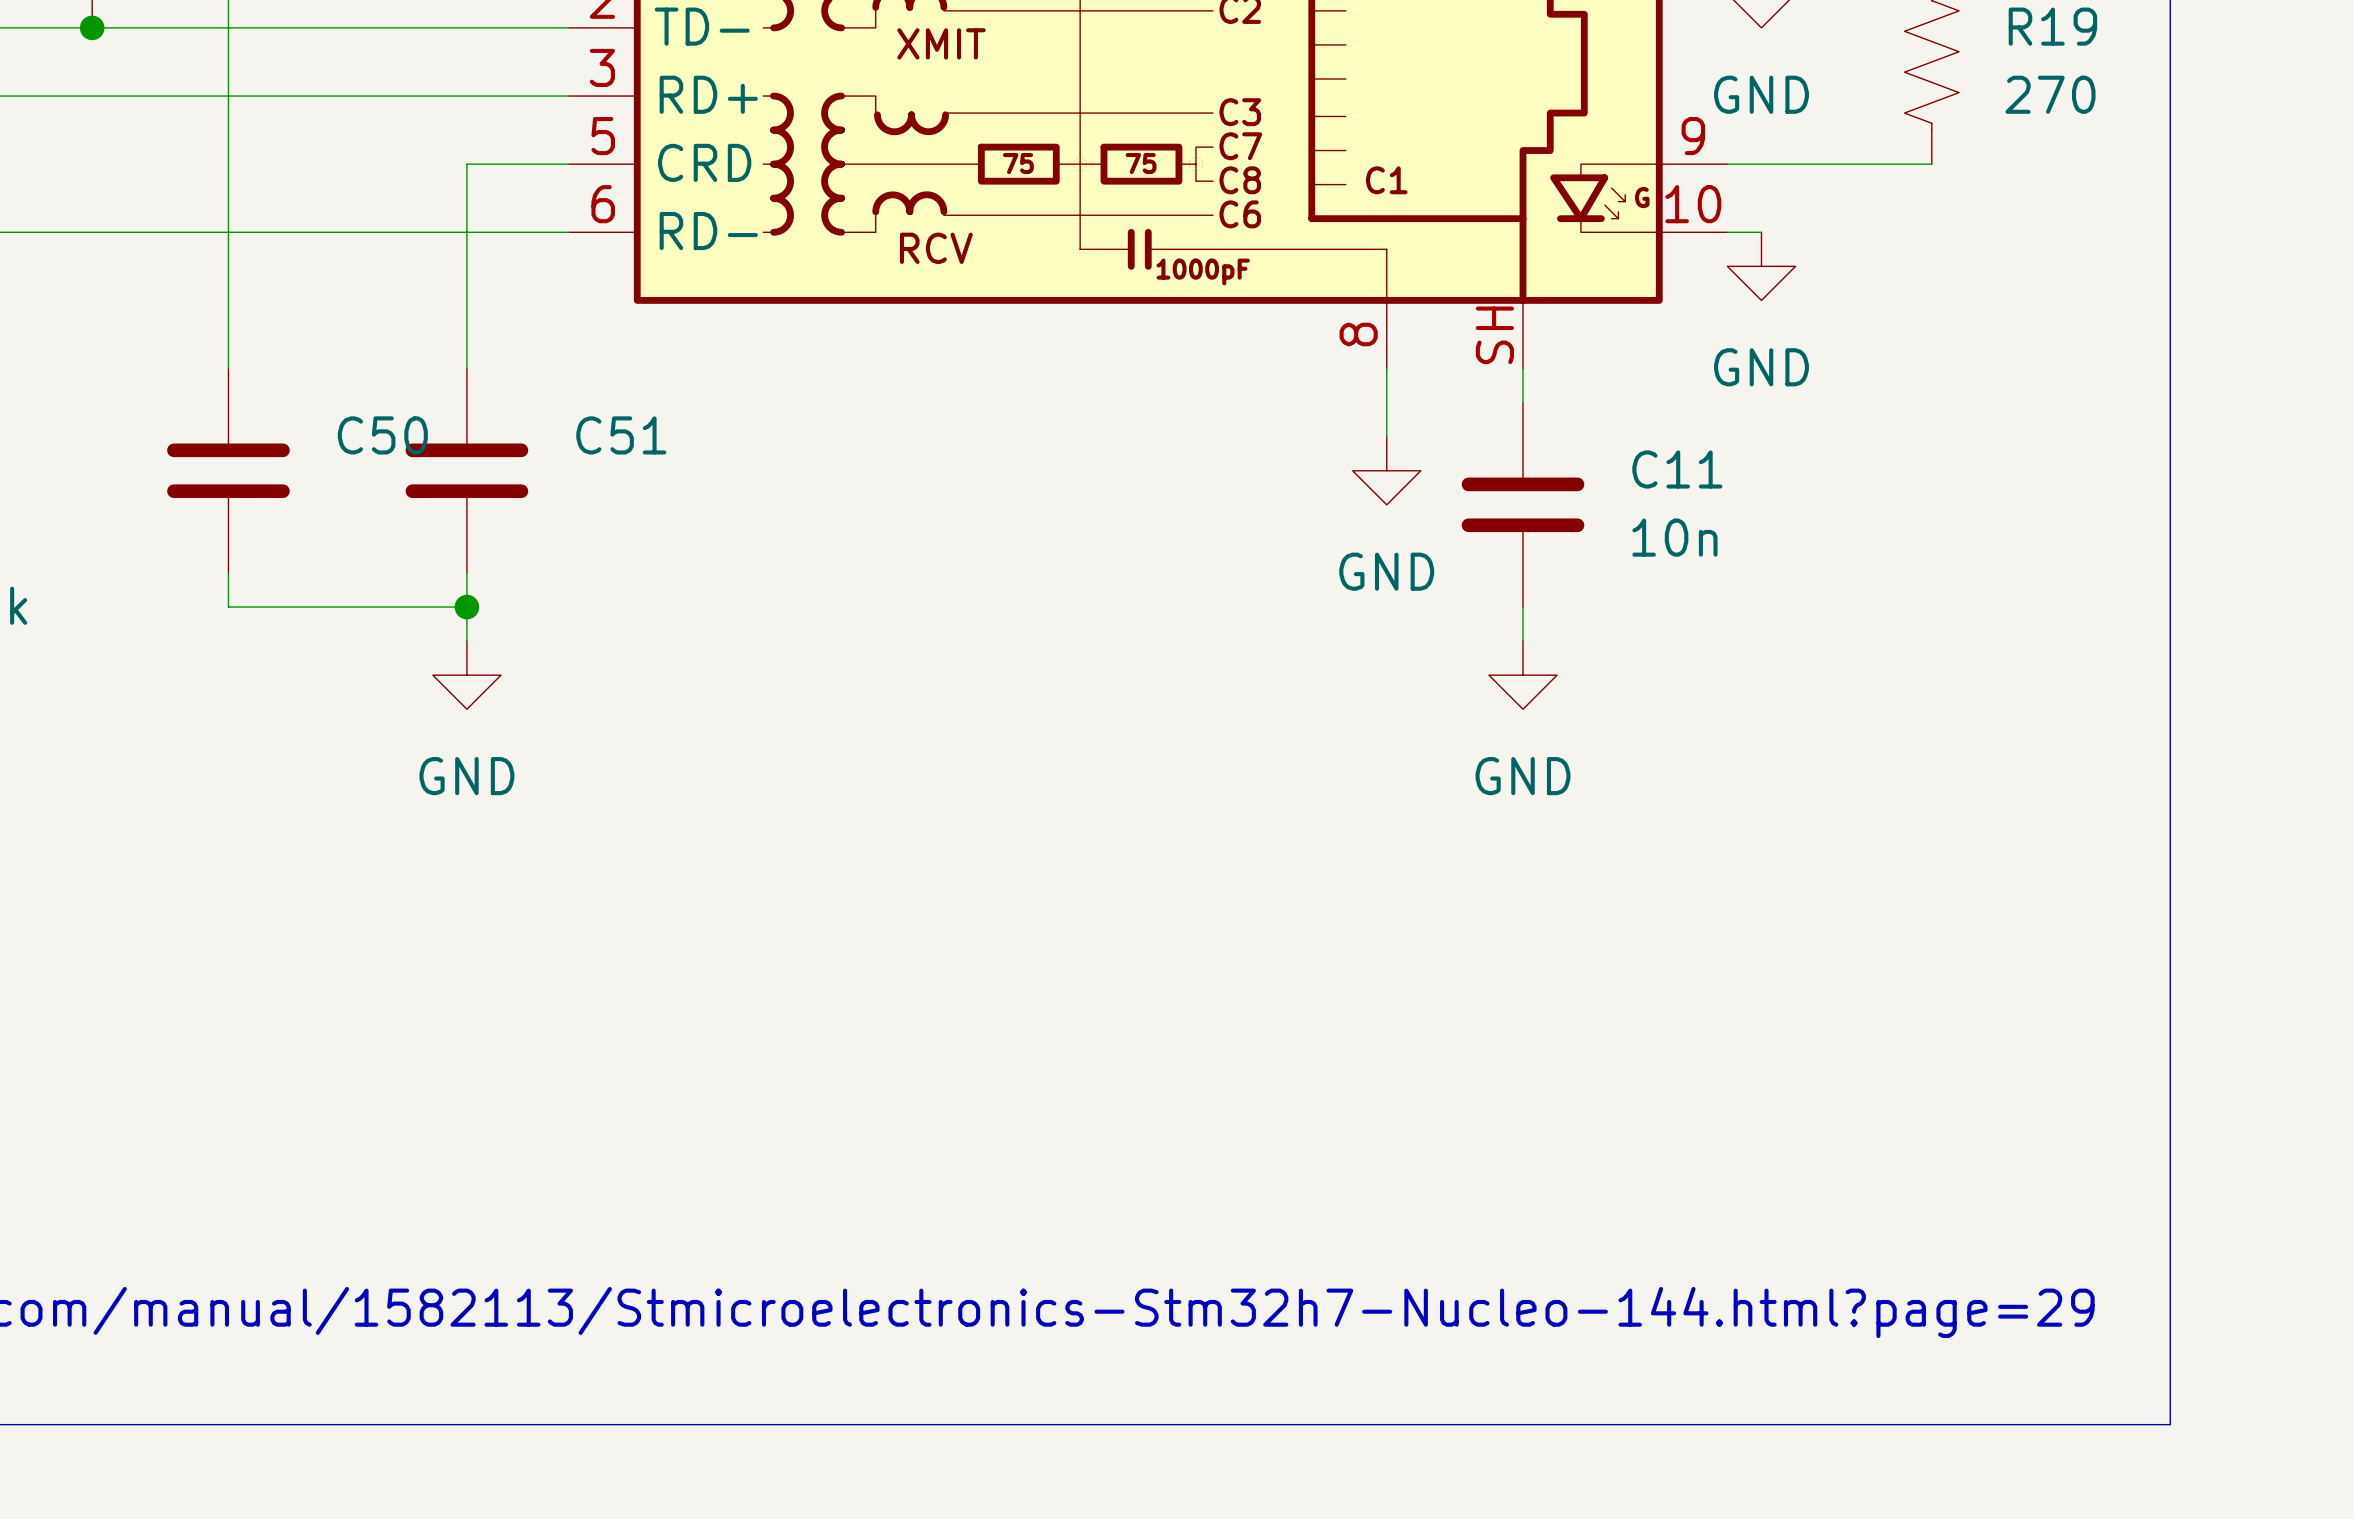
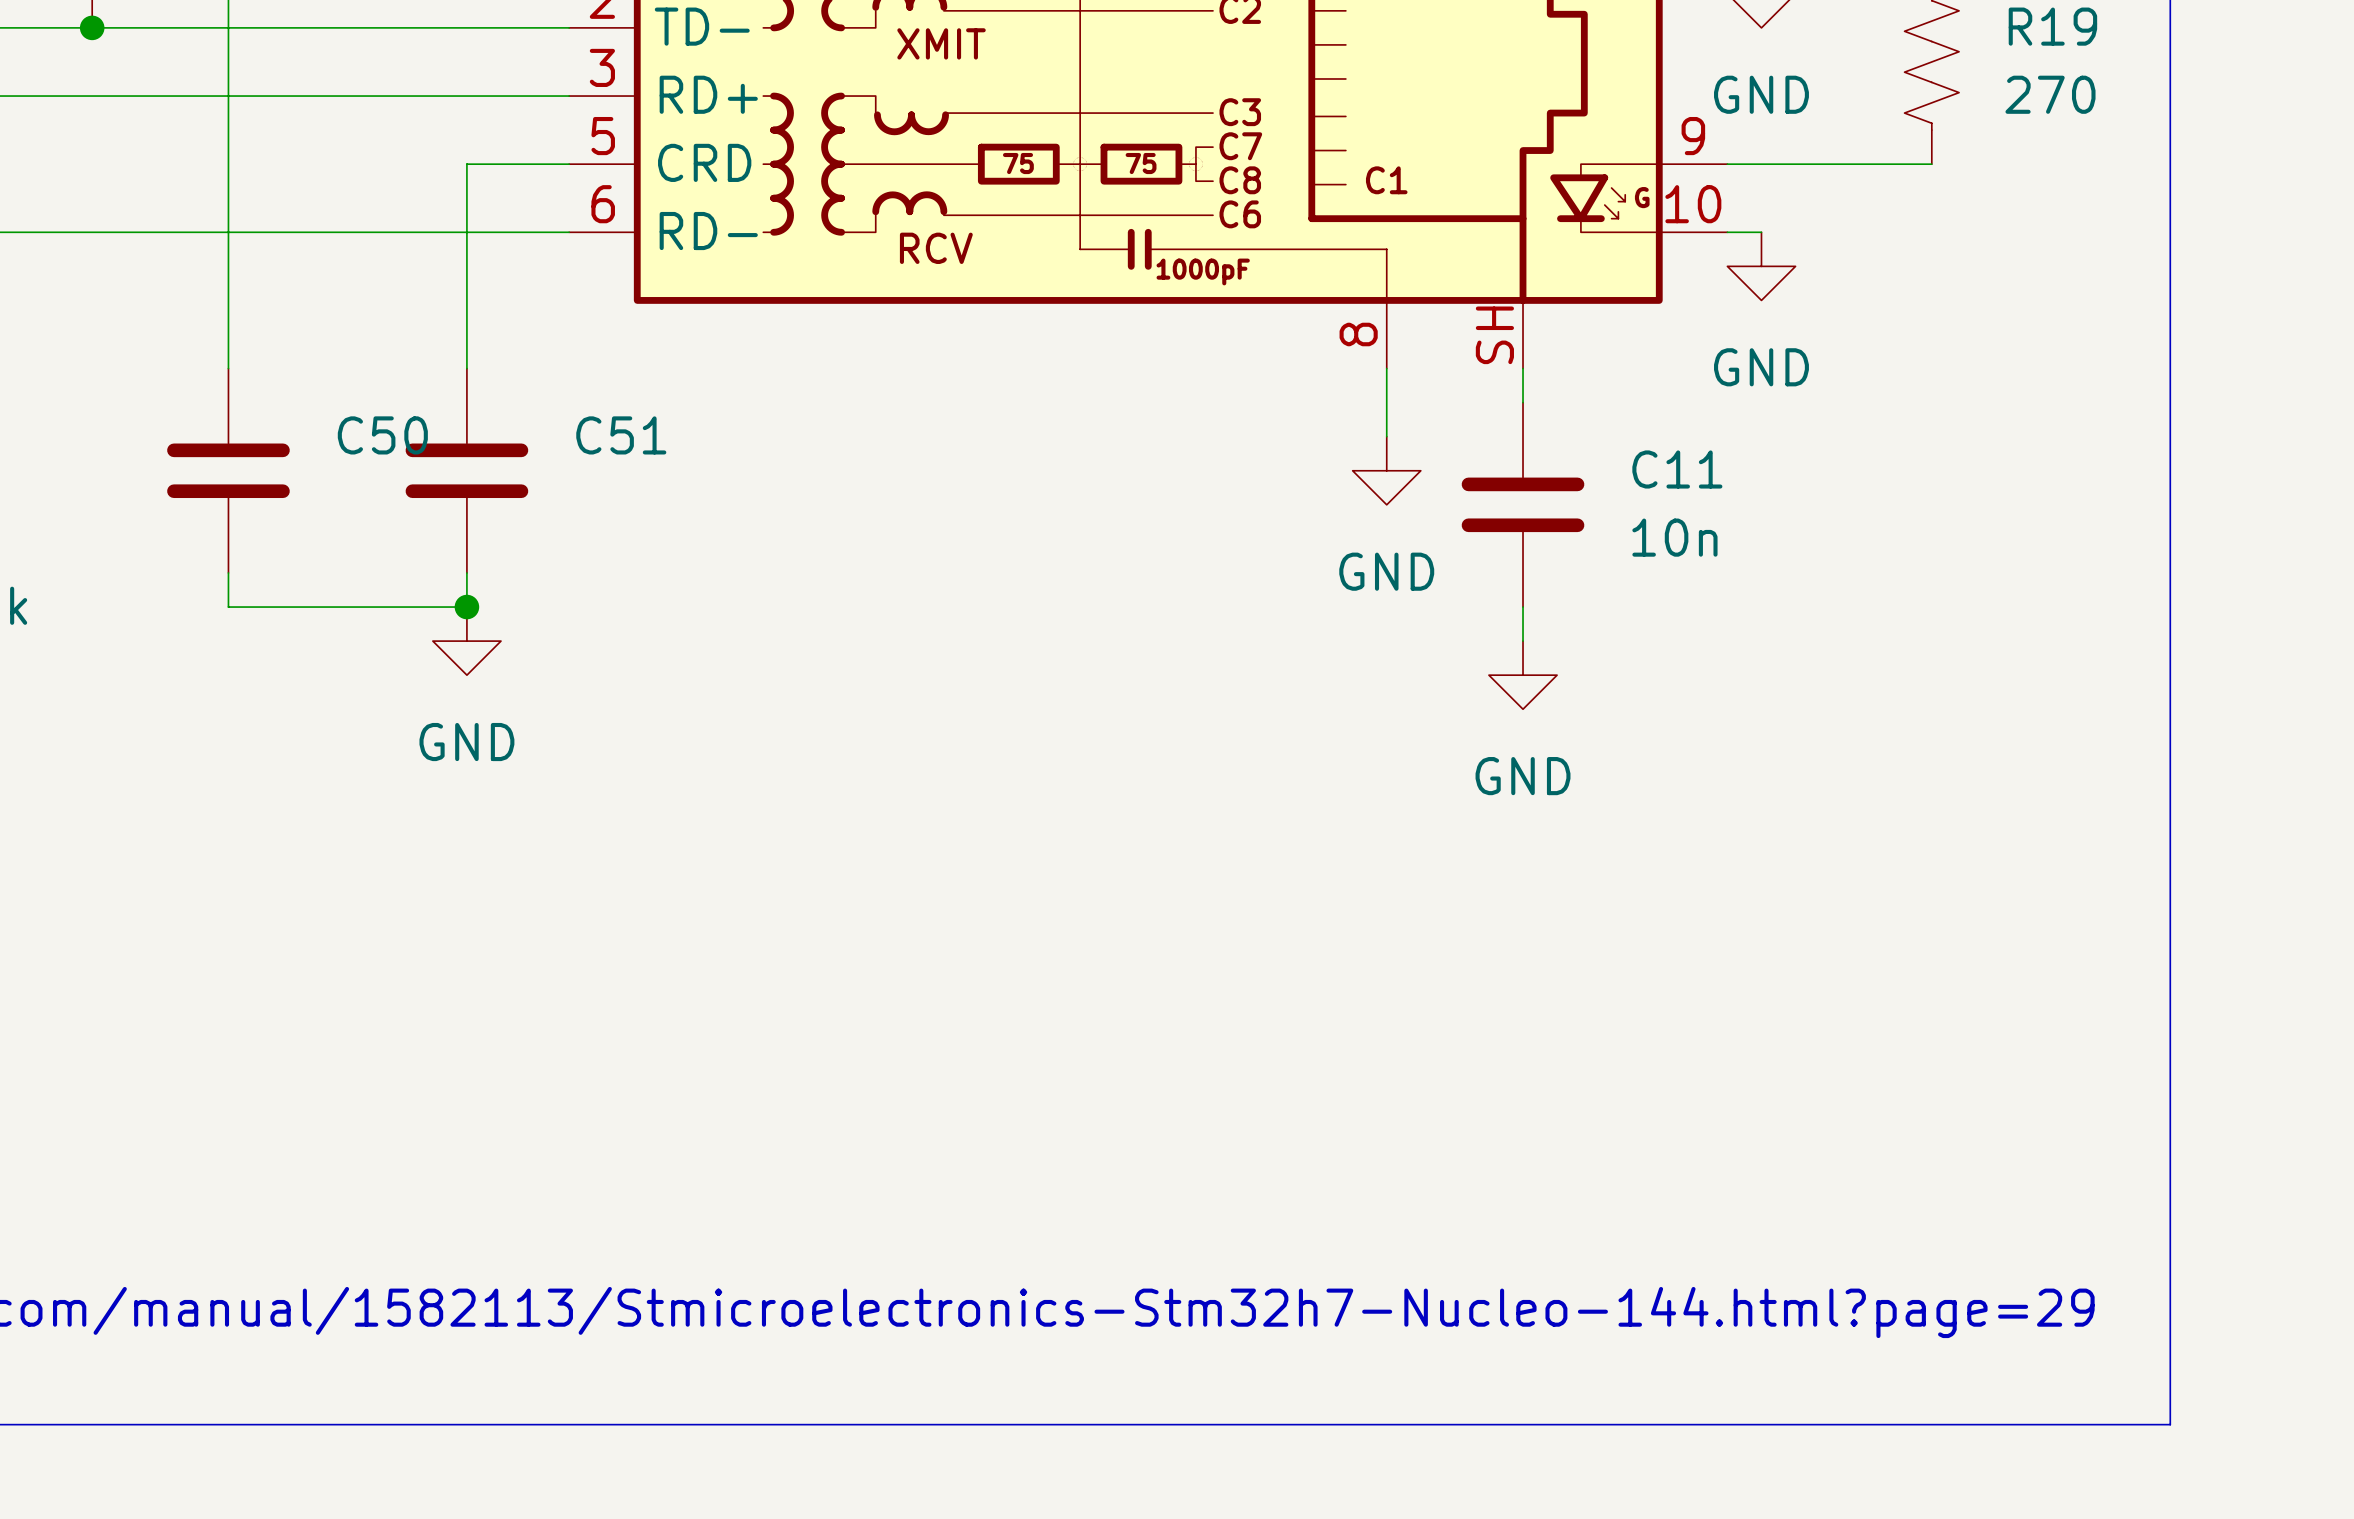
power symbol position: GND (466, 675) -> GND (466, 641)

